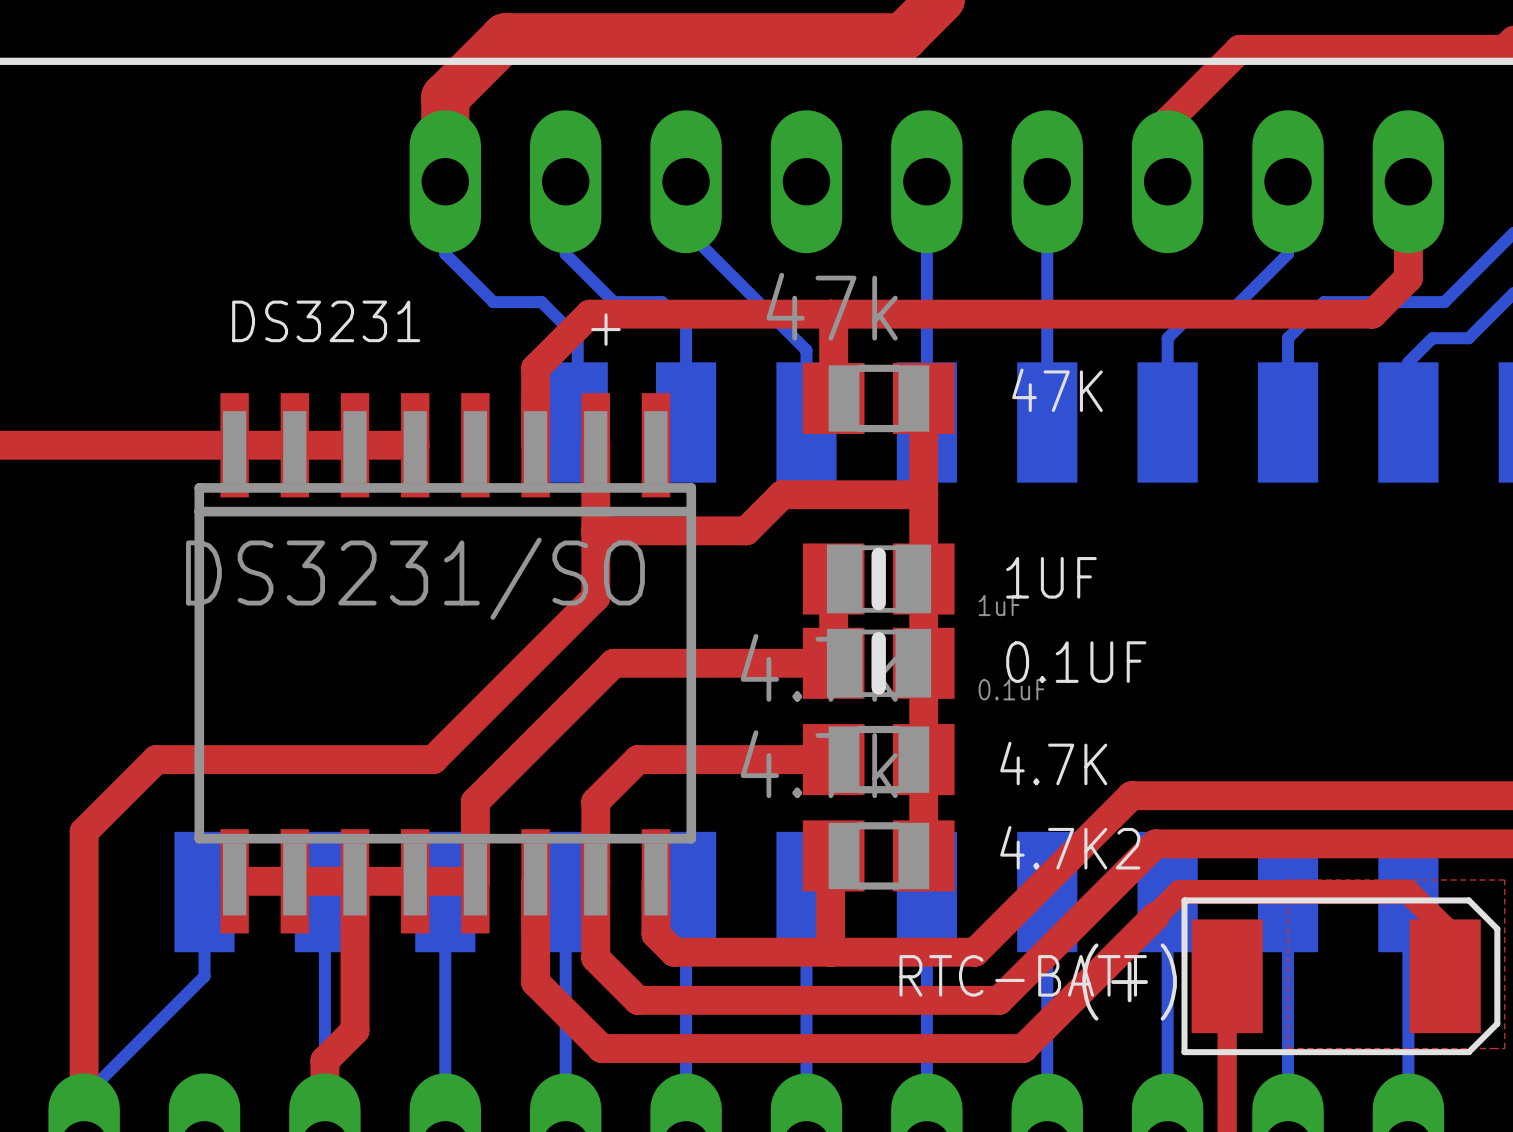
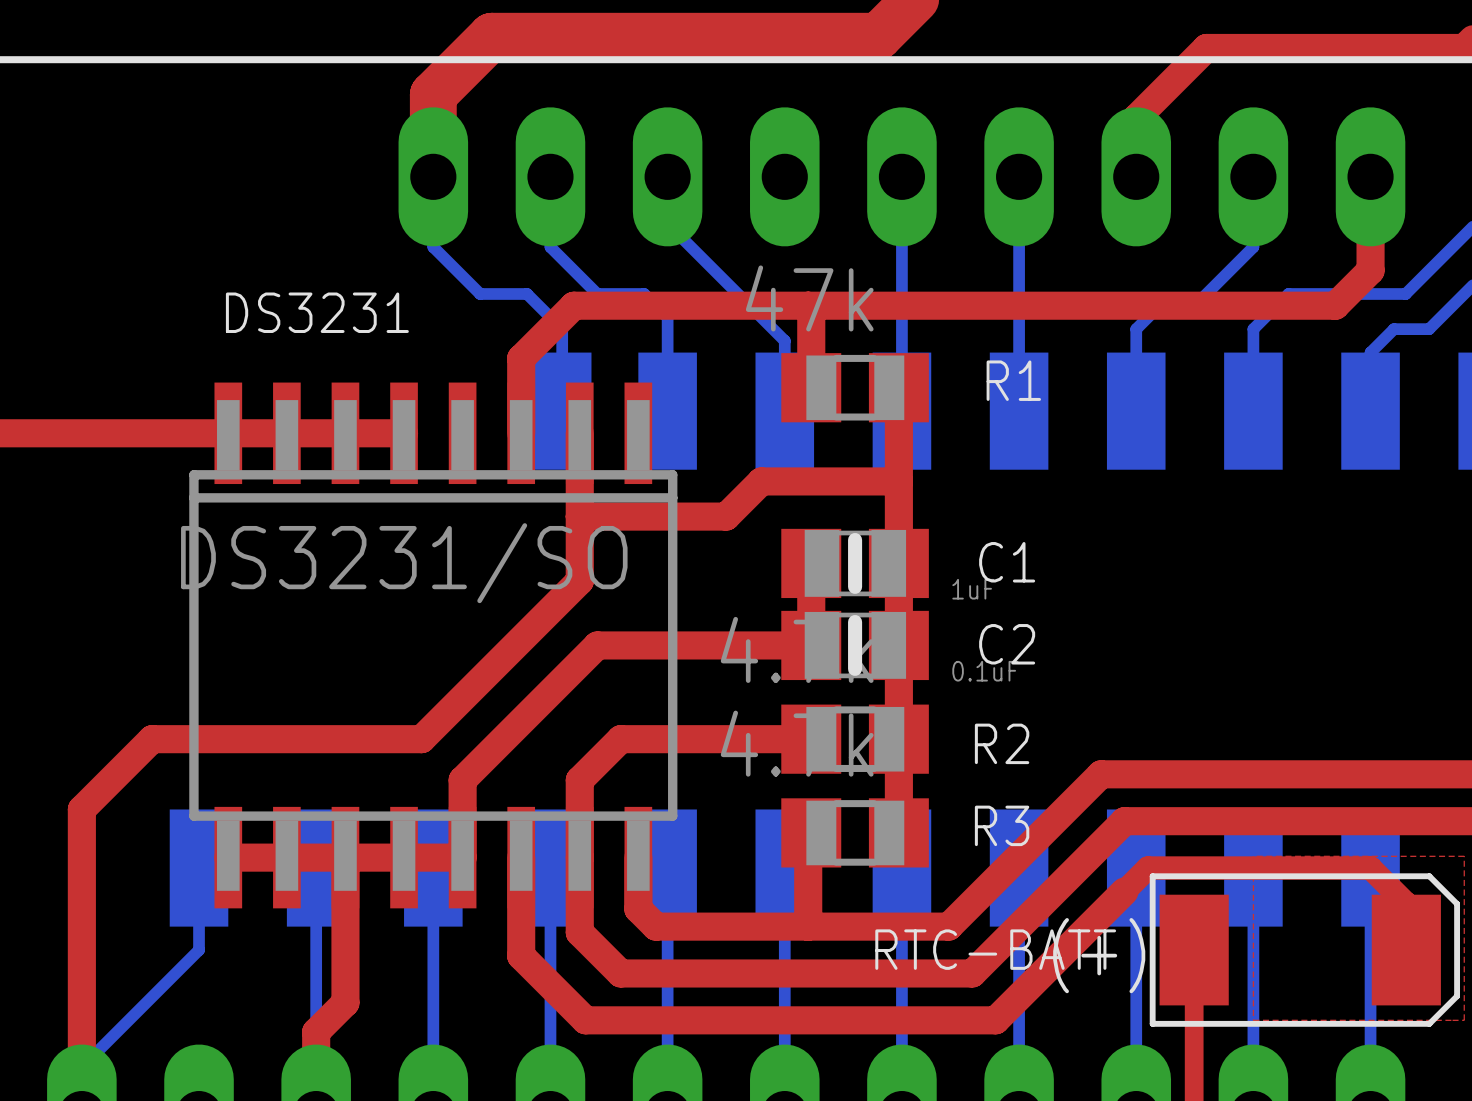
text: + (606, 329) -> none
47K name: 47K (1057, 390) -> R1 (1013, 380)
1UF name: 1UF (1051, 577) -> C1 (1007, 562)
0.1UF name: 0.1UF (1076, 662) -> C2 (1007, 644)
4.7K name: 4.7K (1053, 763) -> R2 (1002, 743)
4.7K2 name: 4.7K2 (1070, 847) -> R3 (1002, 825)

